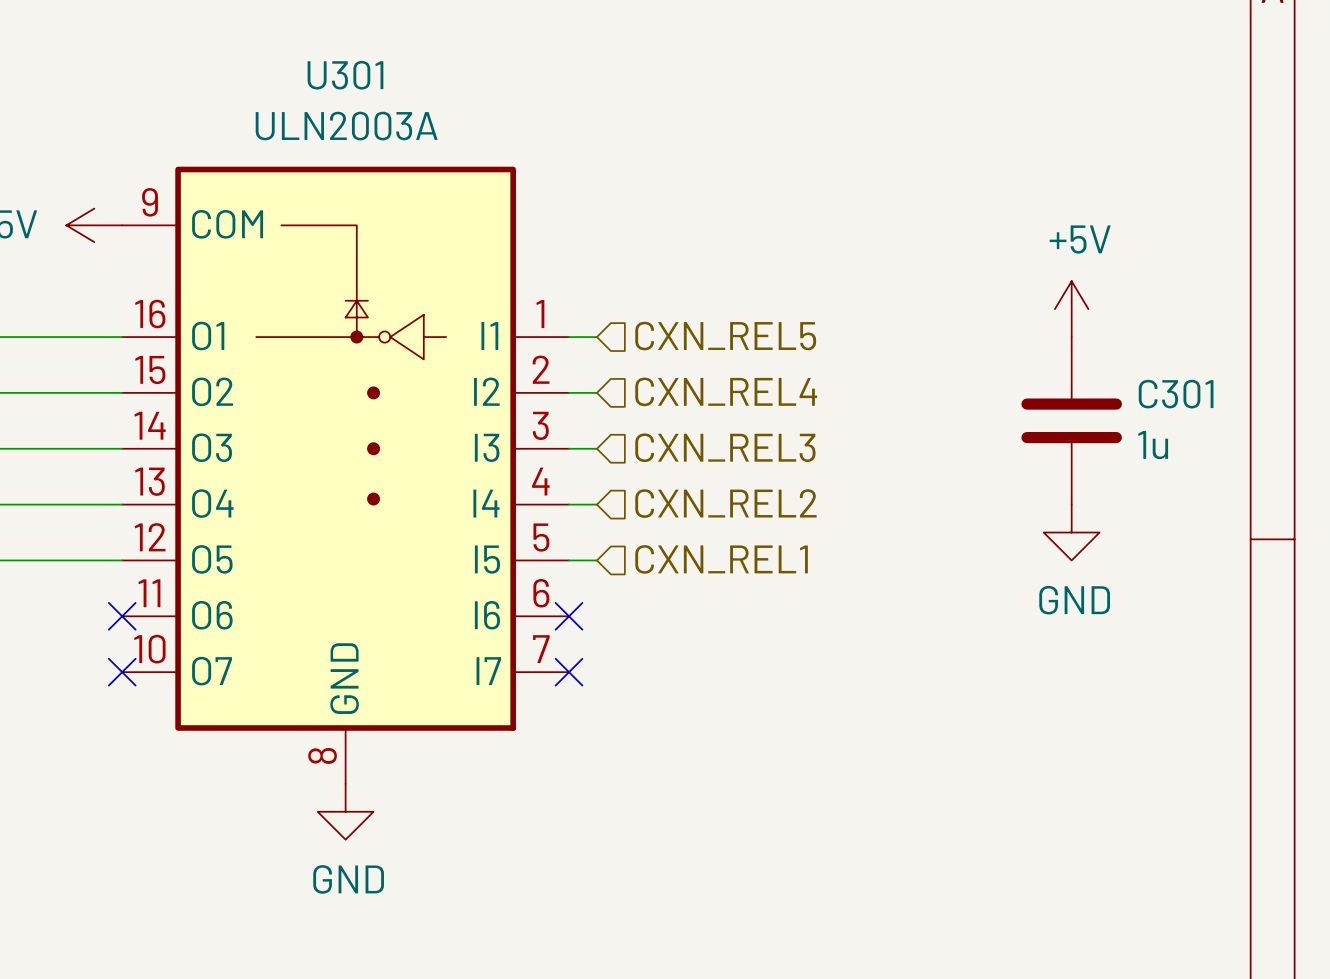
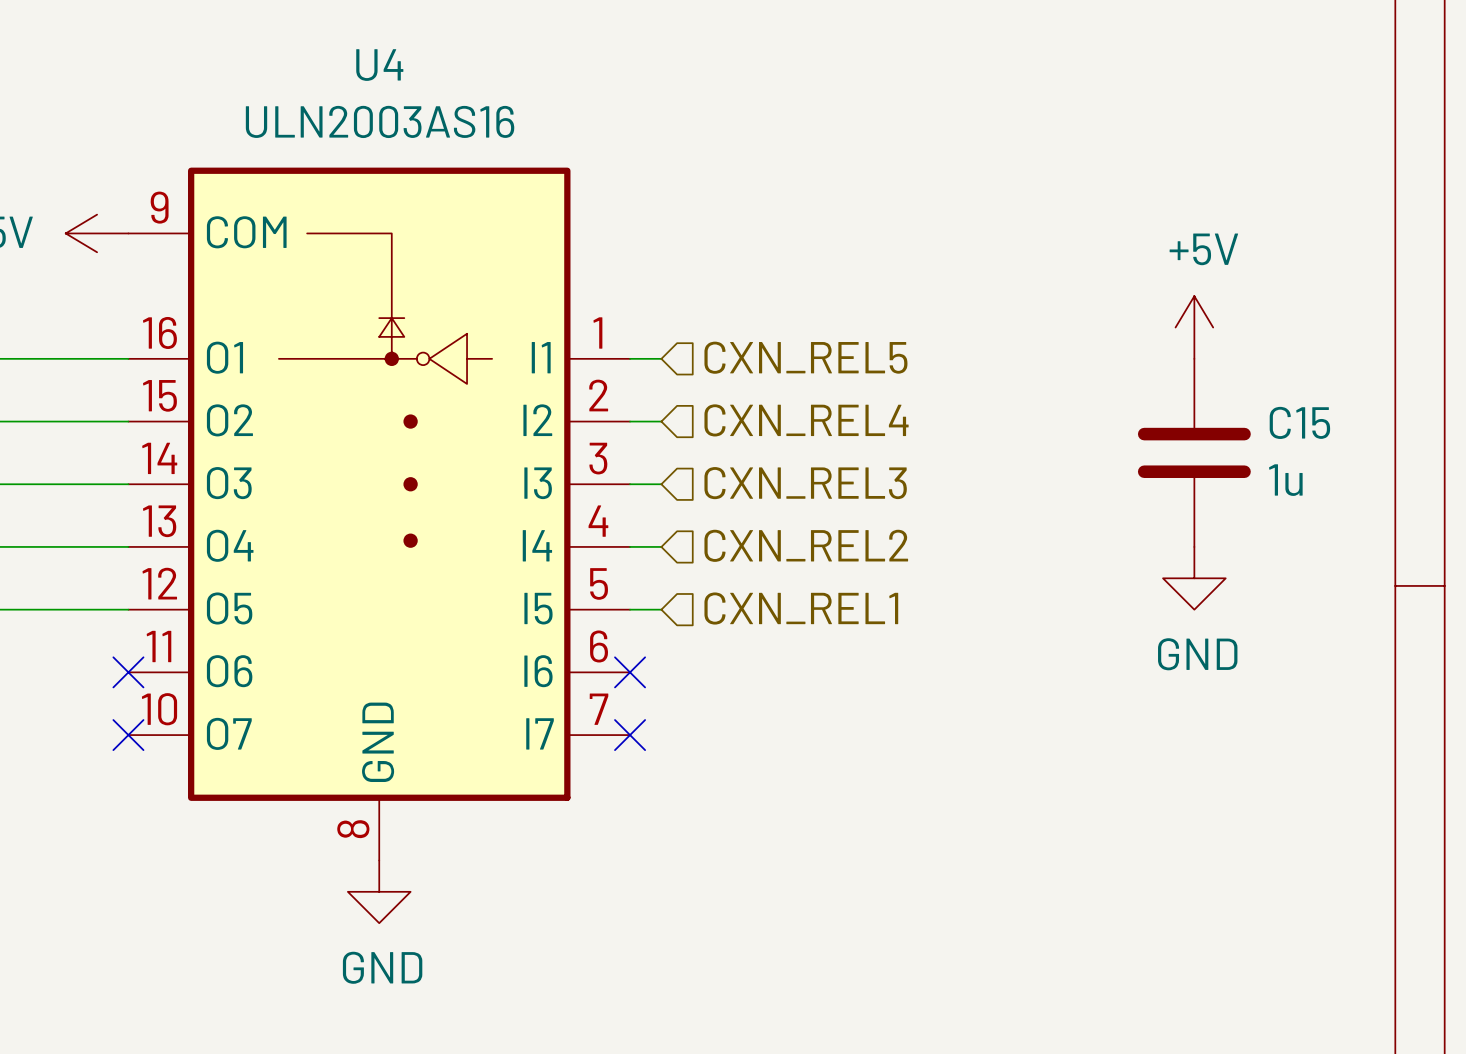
U301 name: U301 (345, 75) -> U4 (379, 65)
U301 value: ULN2003A (346, 126) -> ULN2003AS16 (380, 121)
C301 name: C301 (1176, 394) -> C15 (1299, 422)

